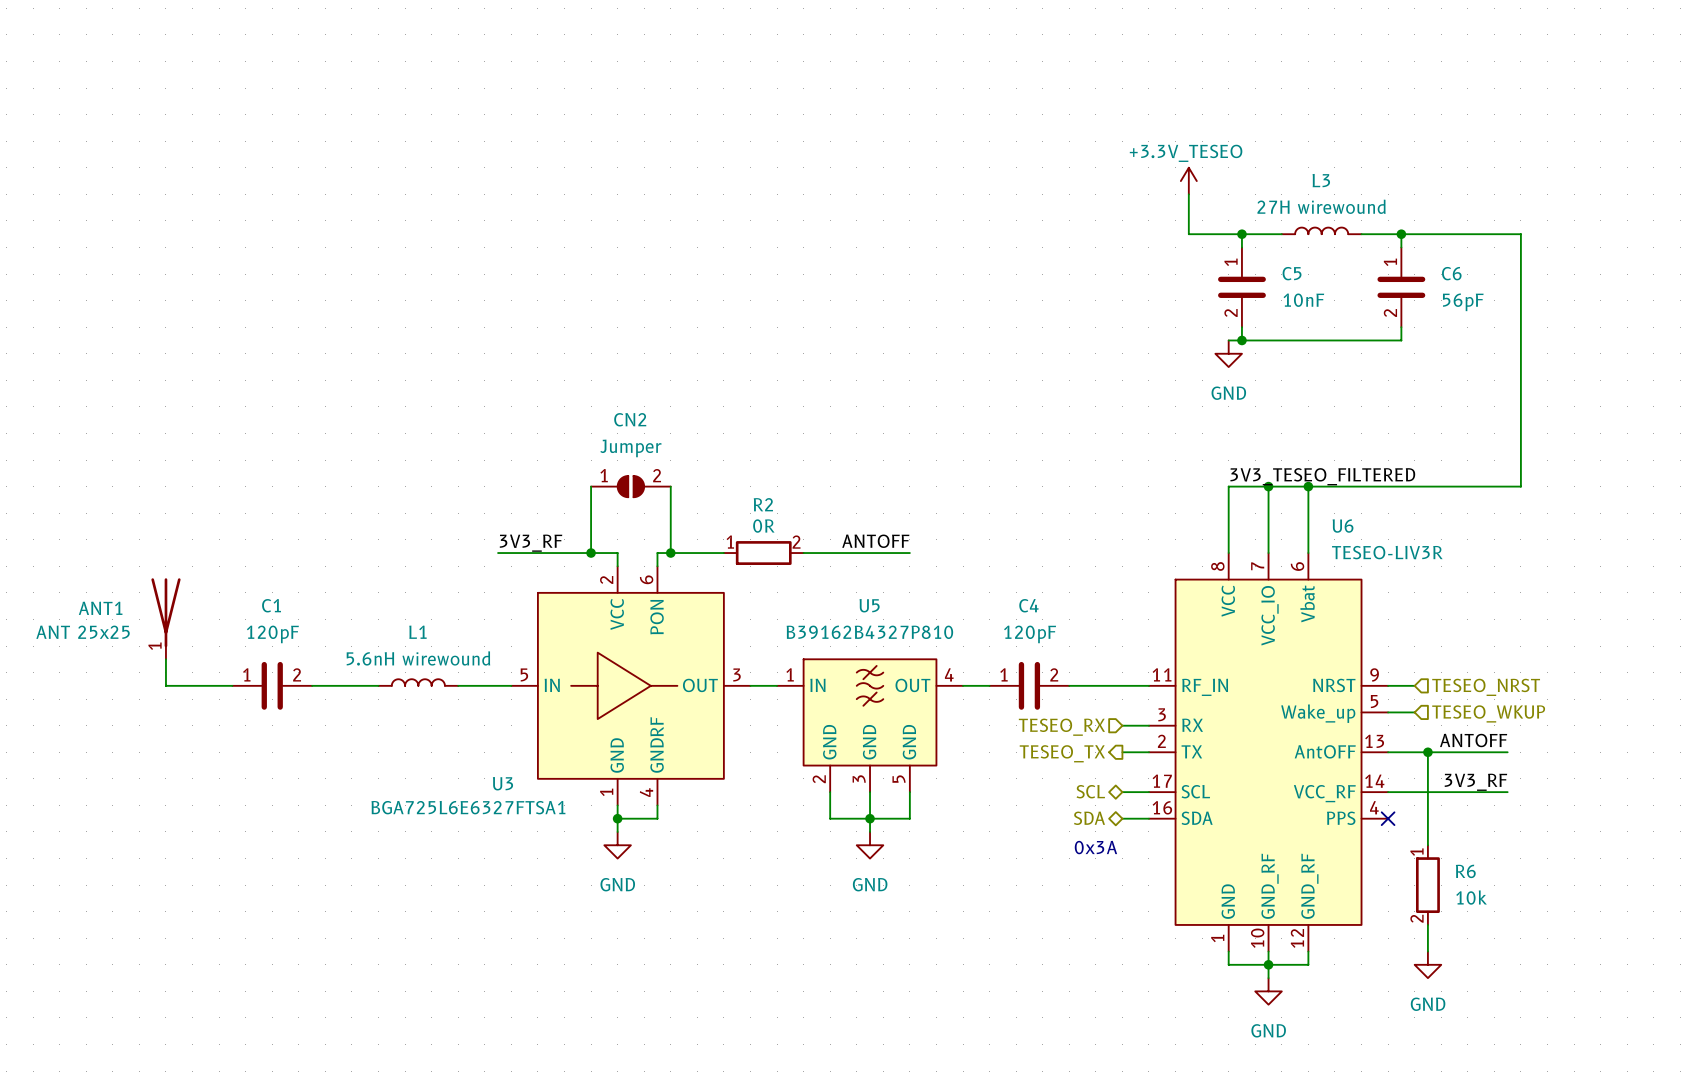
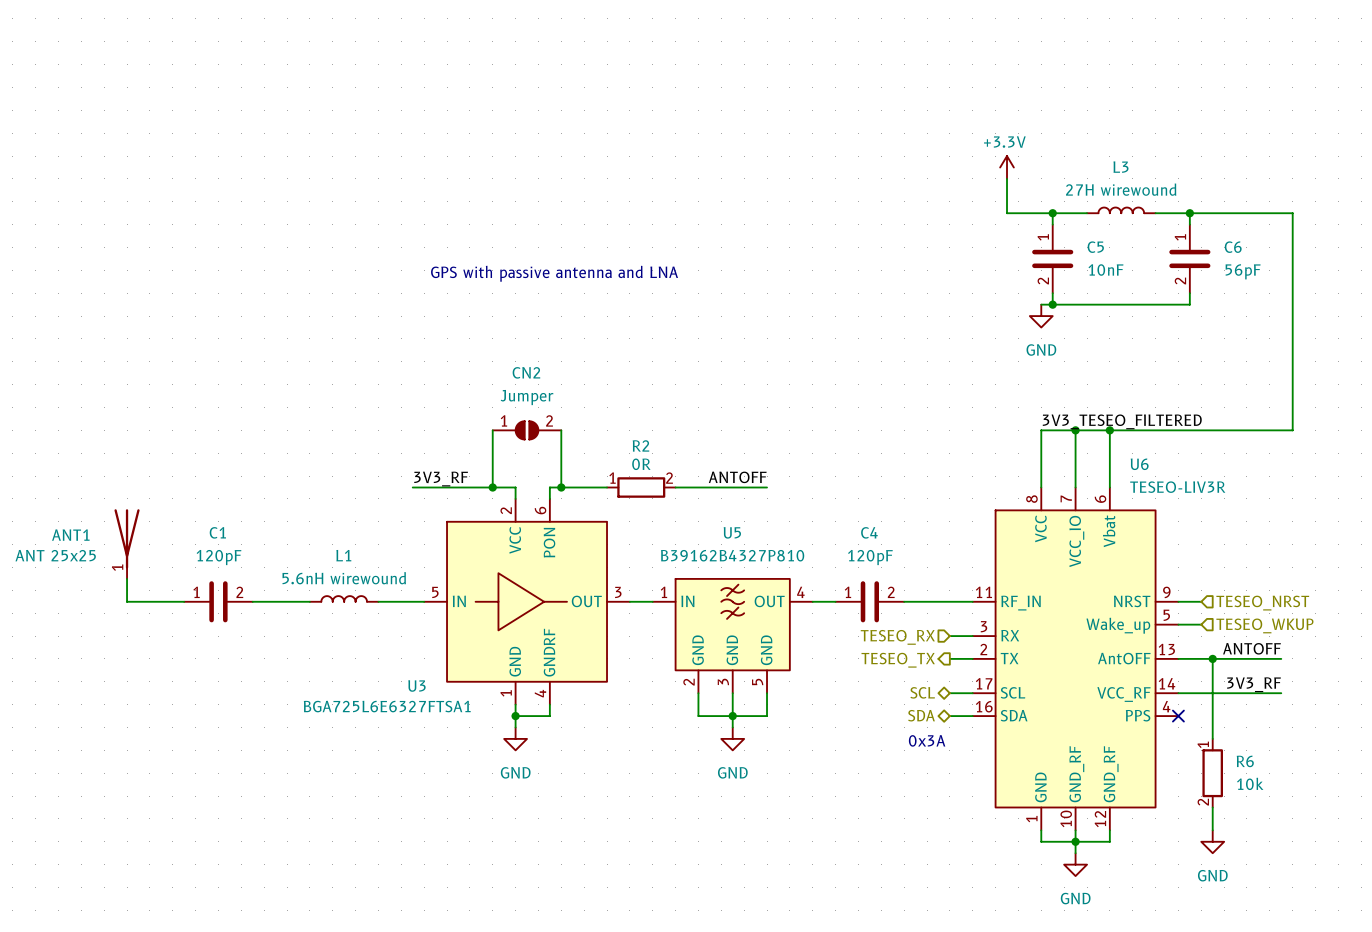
power symbol: +3.3V_TESEO (1188, 181) -> +3.3V (1007, 167)
text: none -> GPS with passive antenna and LNA (554, 273)

